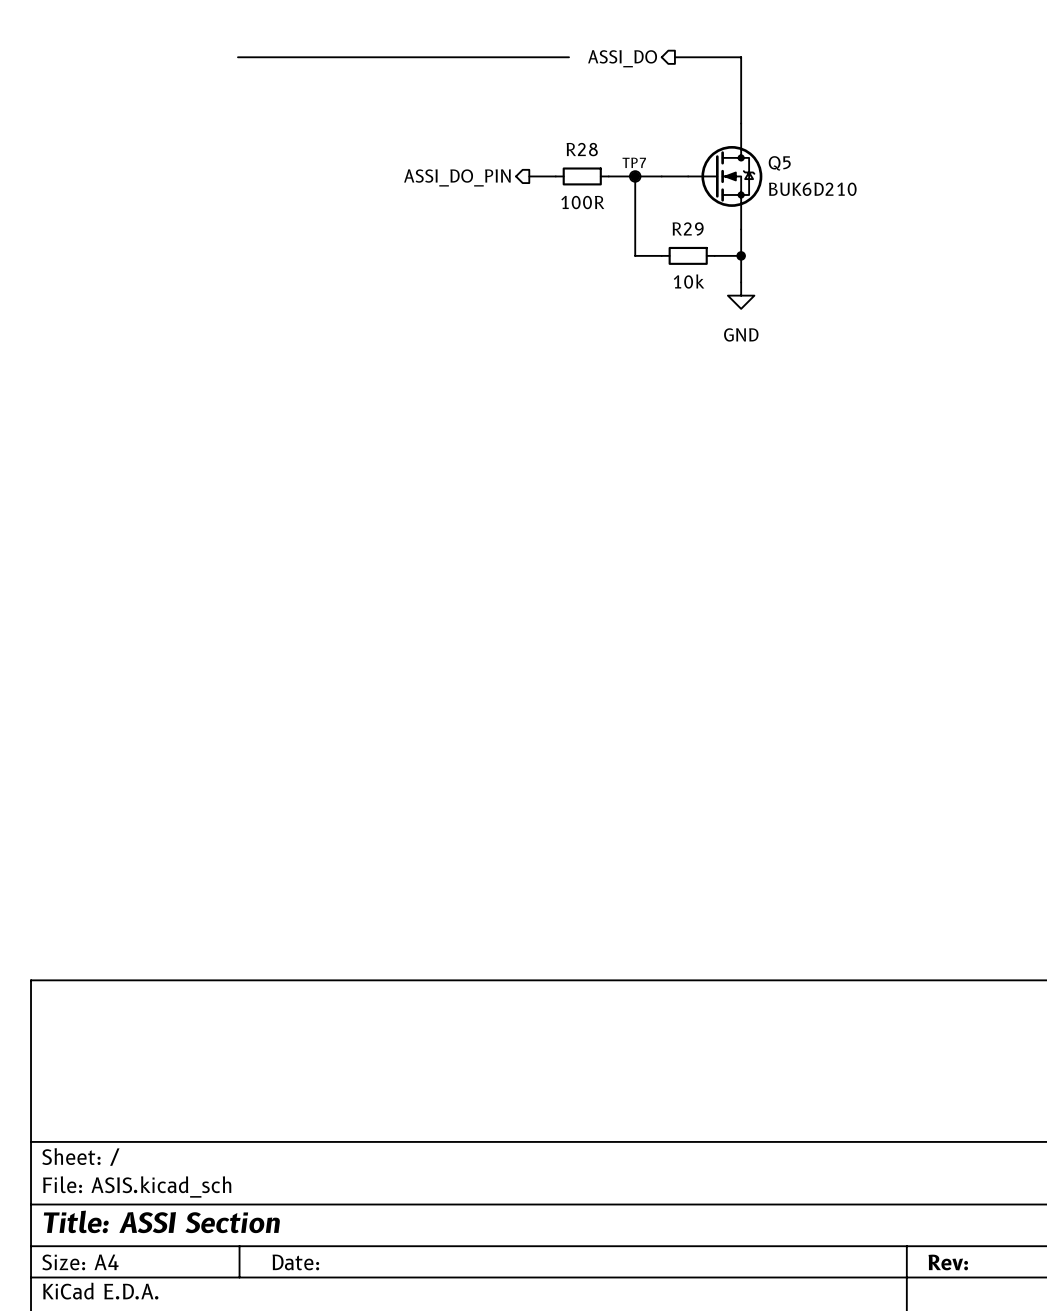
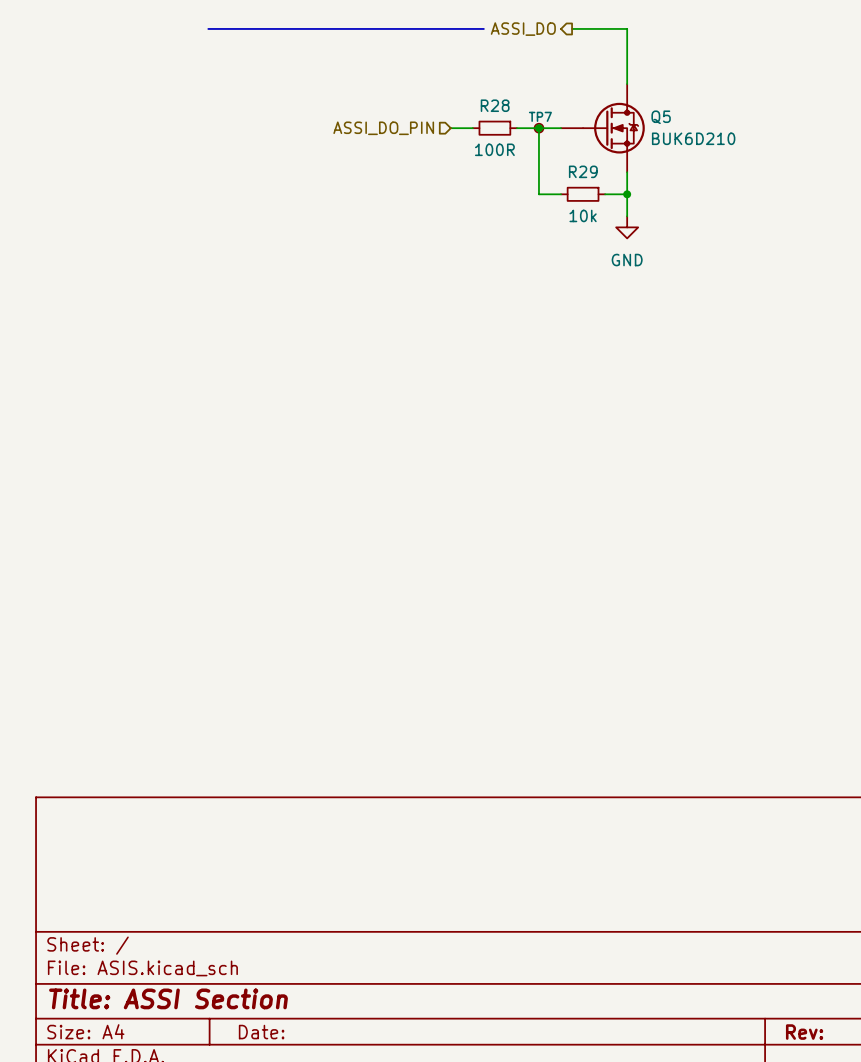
hierarchical label shape: output (457, 177) -> input (383, 128)

